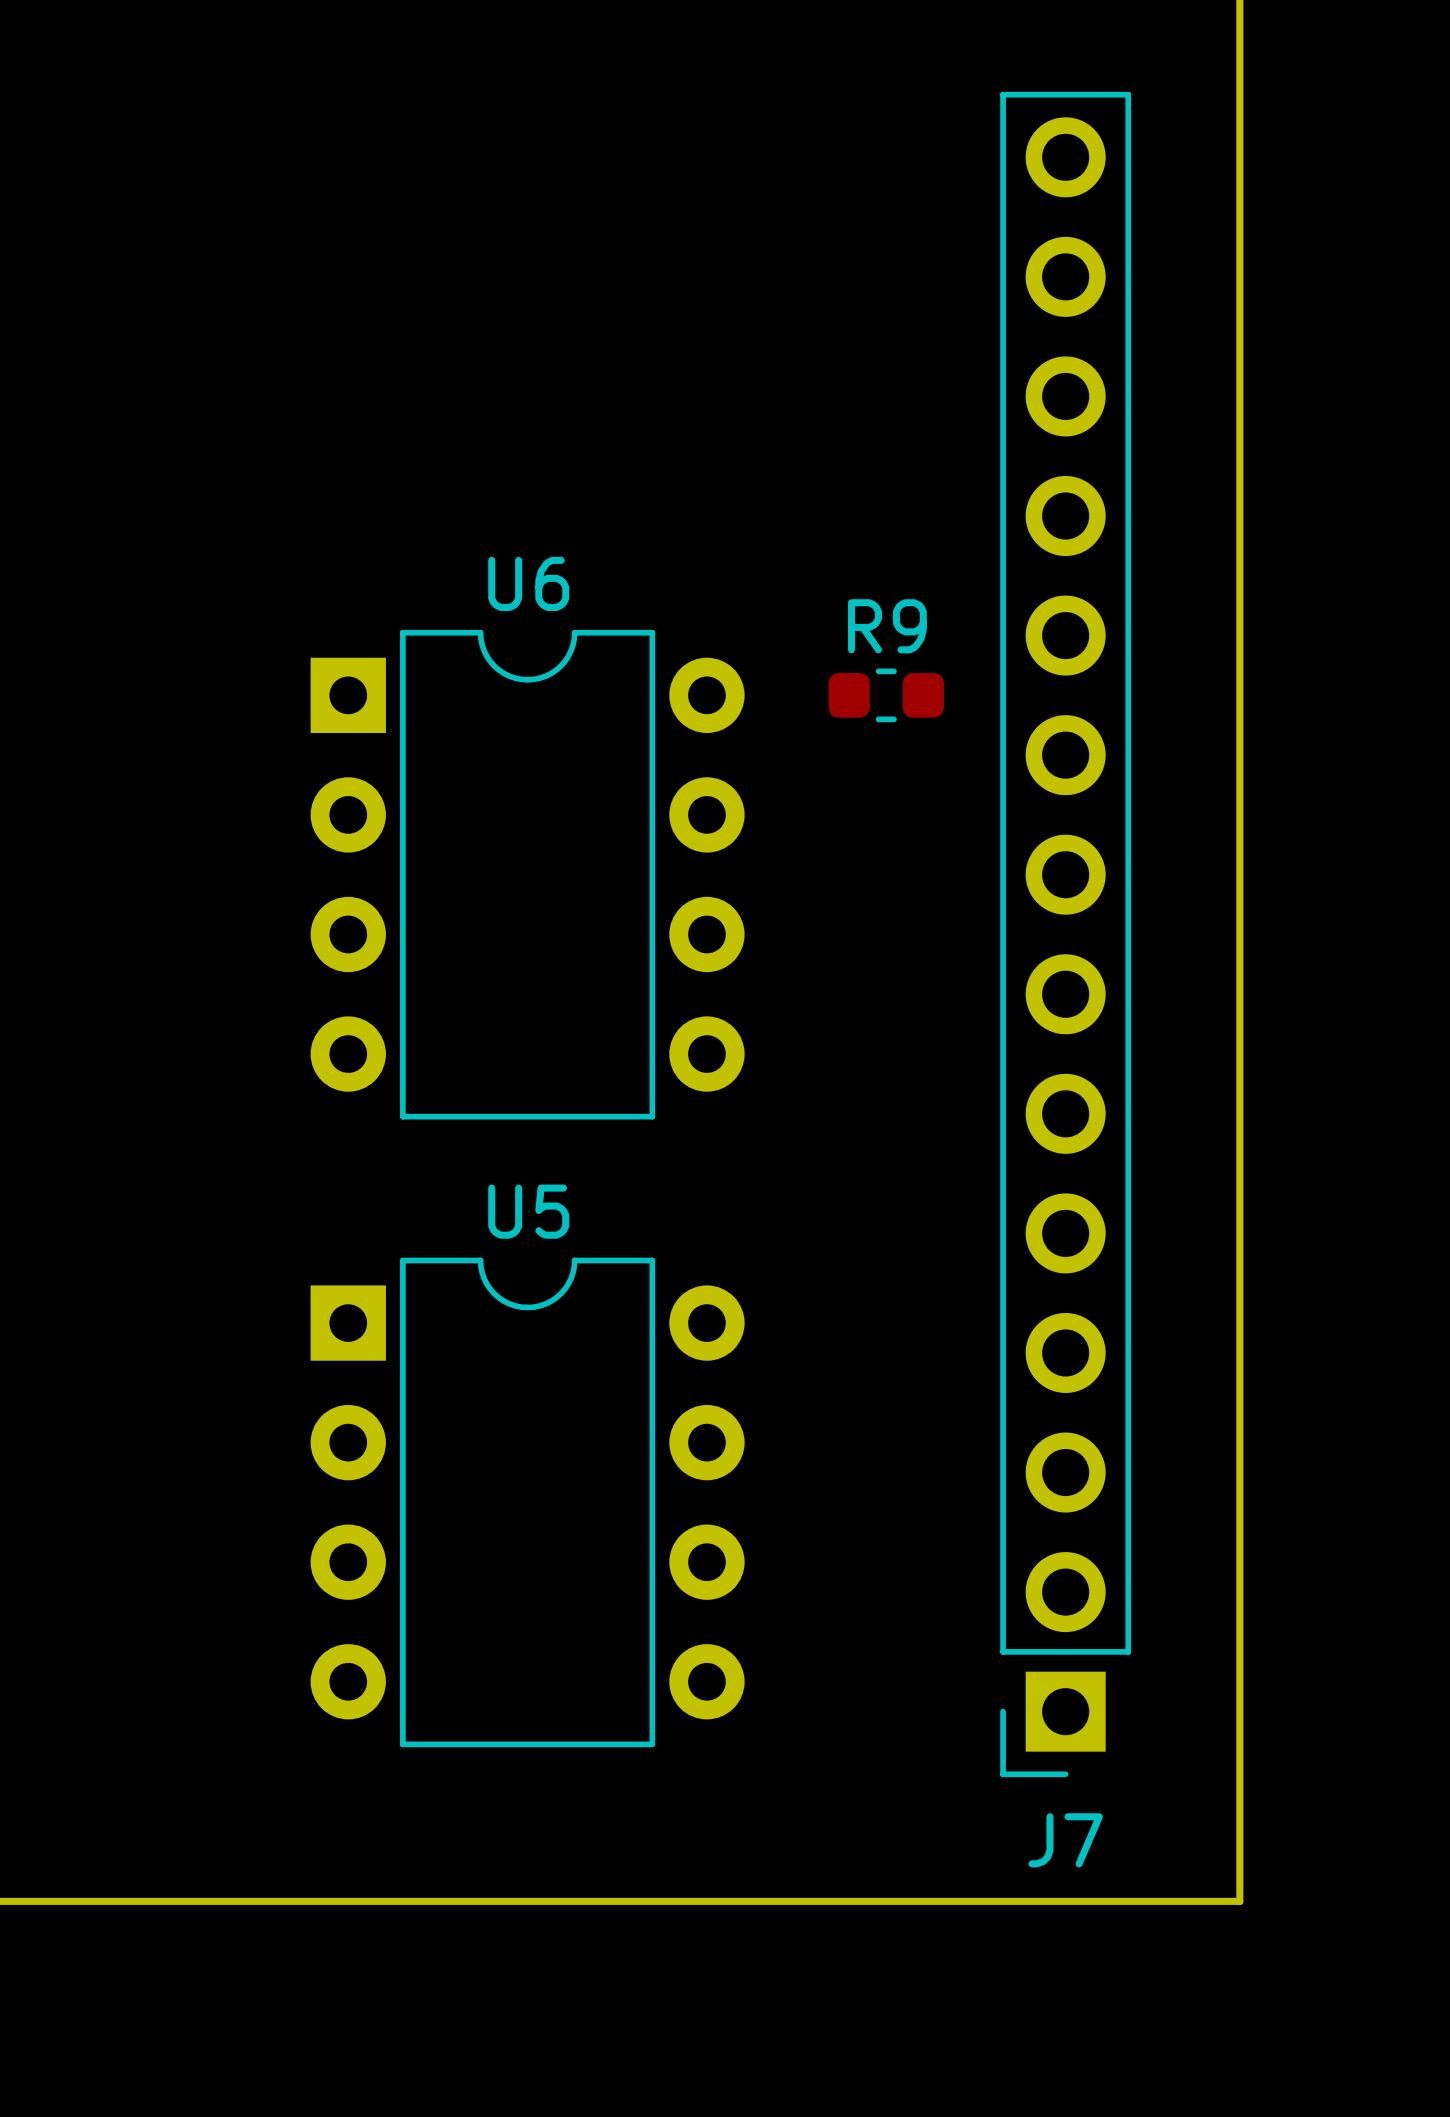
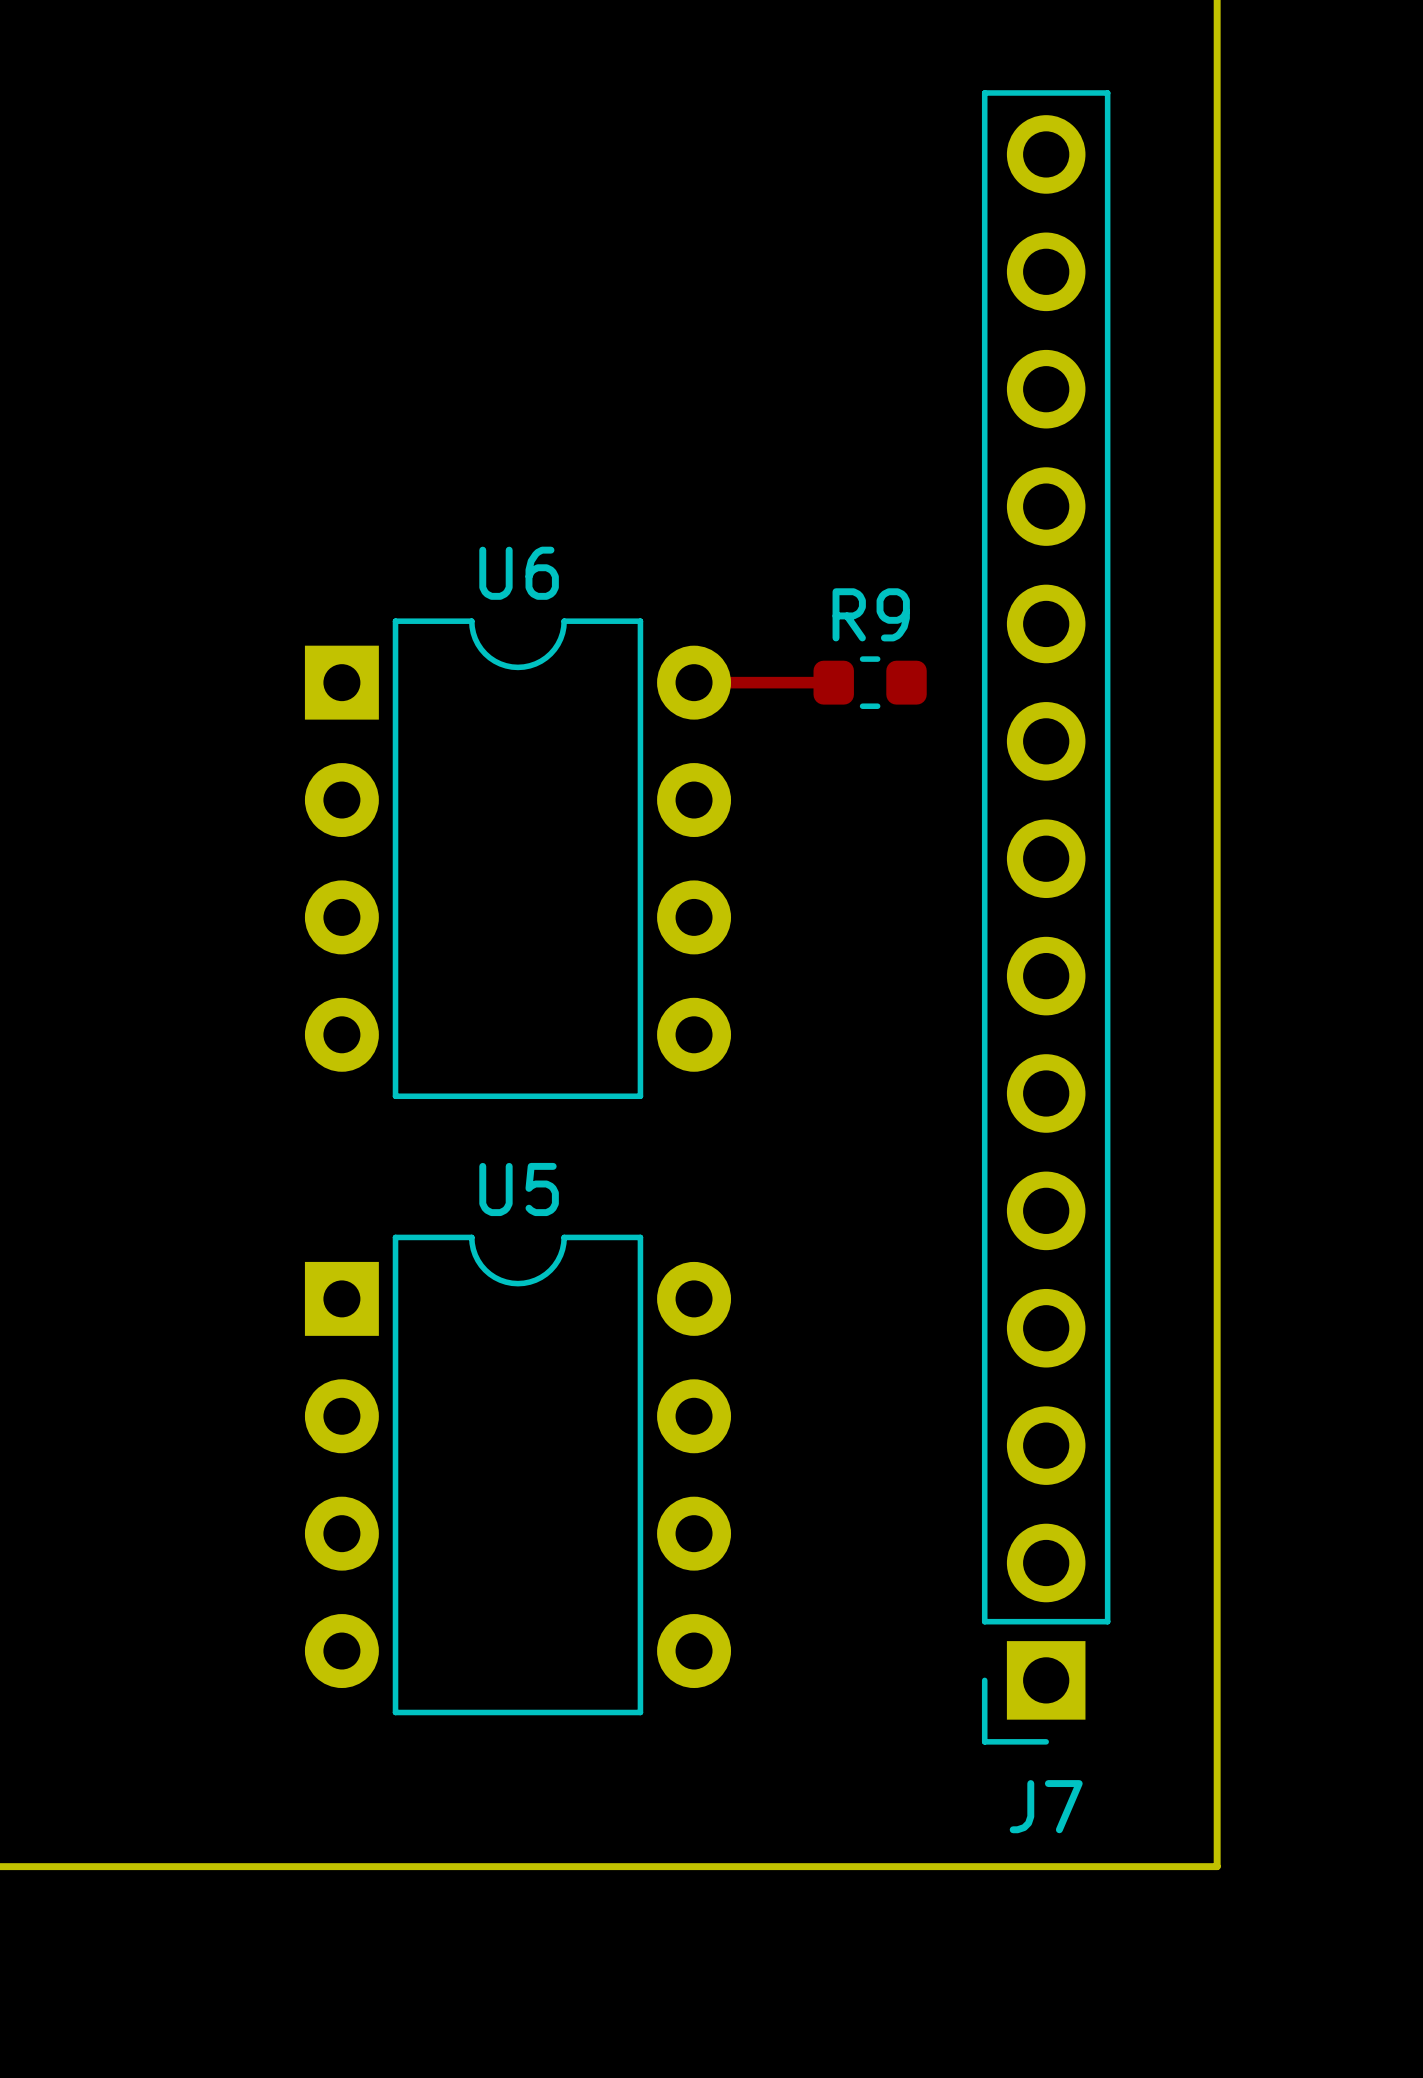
track: none -> (694, 682) (833, 682)

